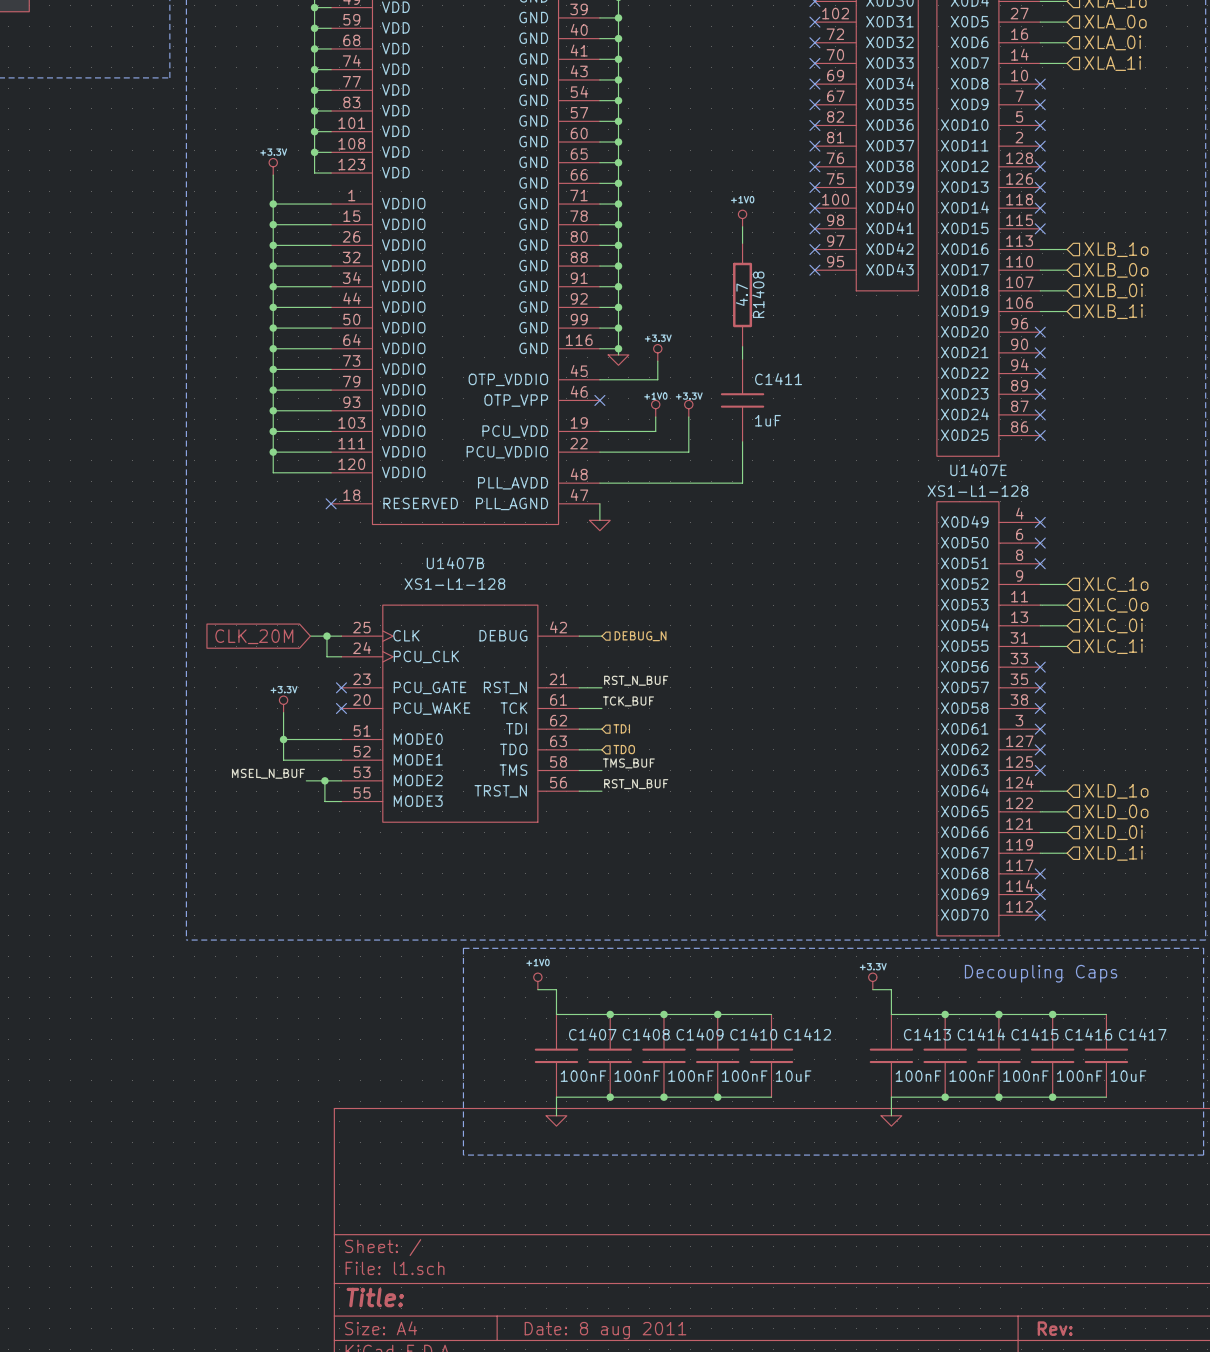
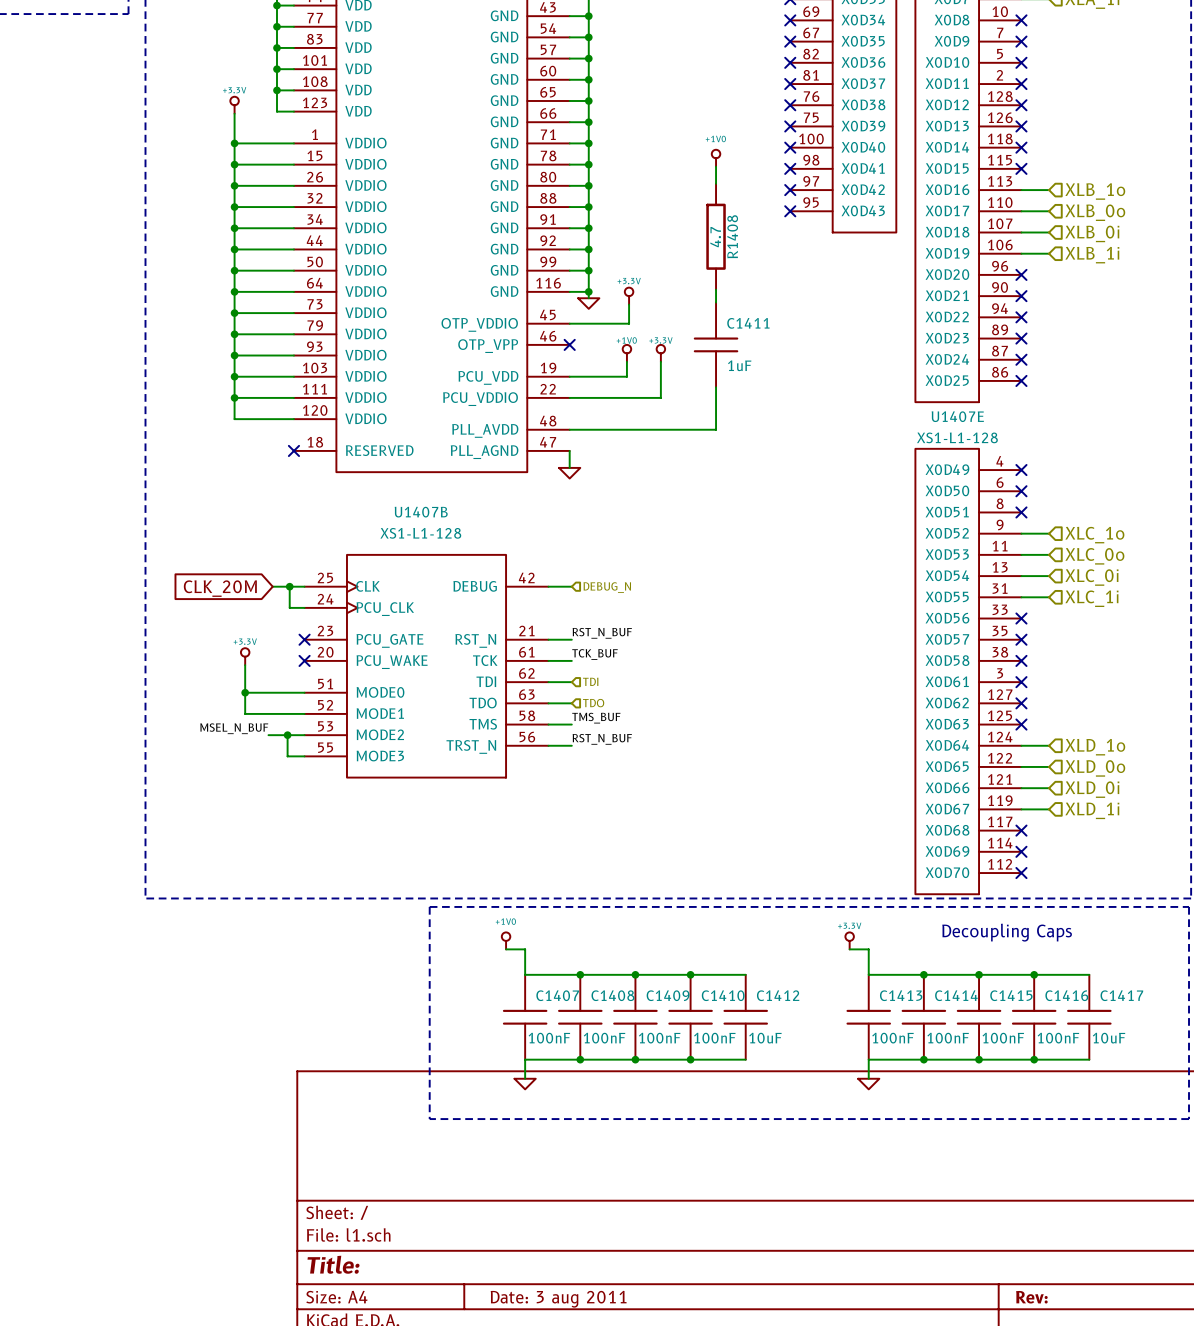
title block: Date: 8 aug 2011 (605, 1330) -> Date: 3 aug 2011 (558, 1299)

